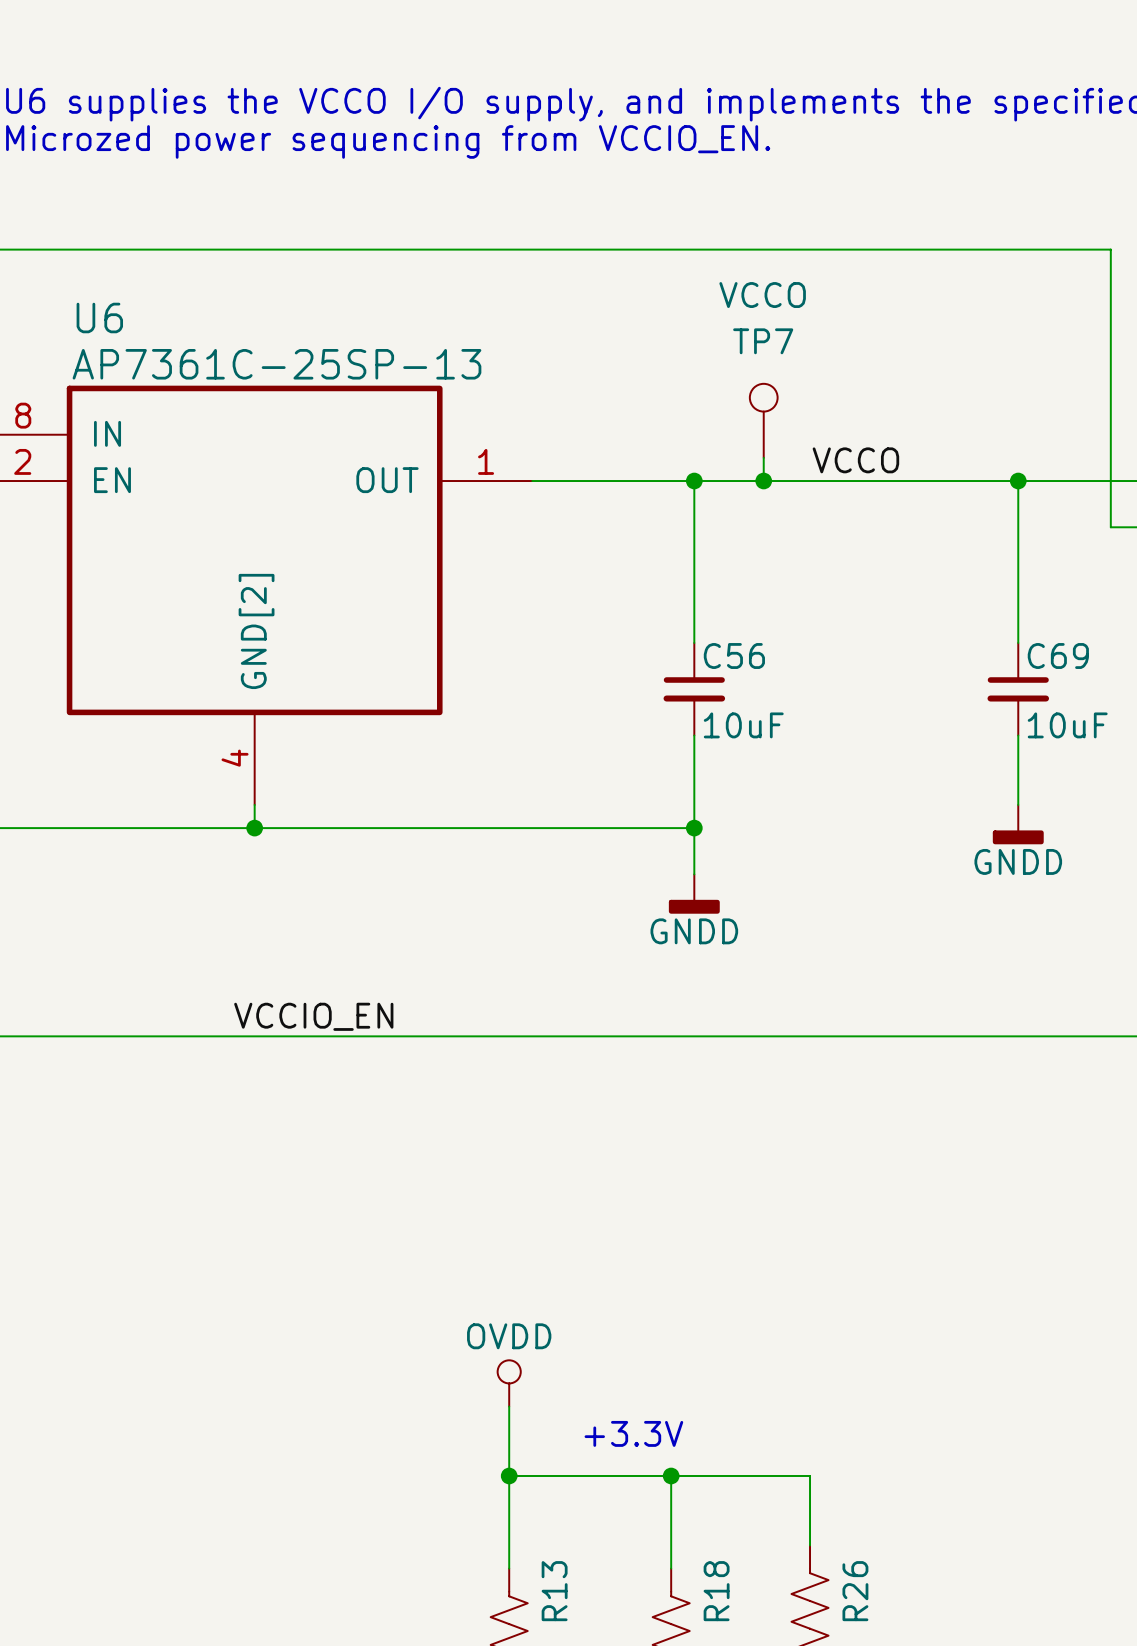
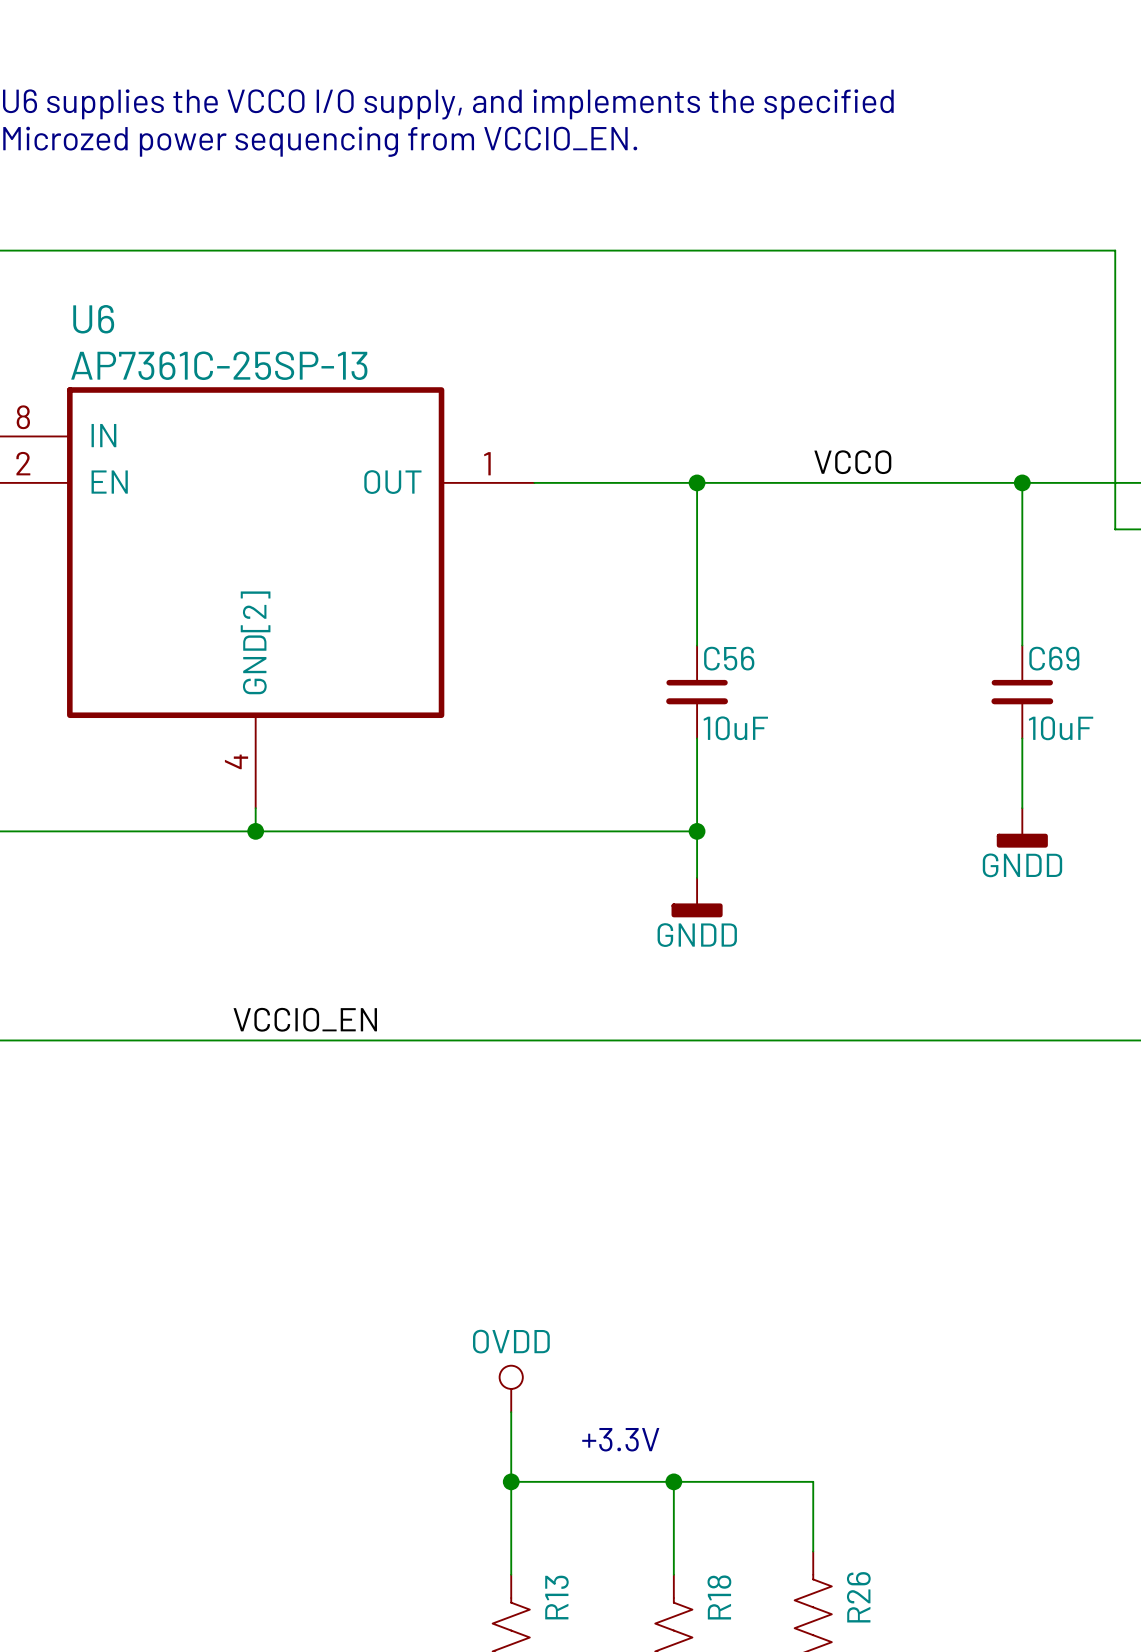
TP7: VCCO (763, 420) -> none
wire: (763, 457) (763, 481) -> none
junction: (763, 481) -> none

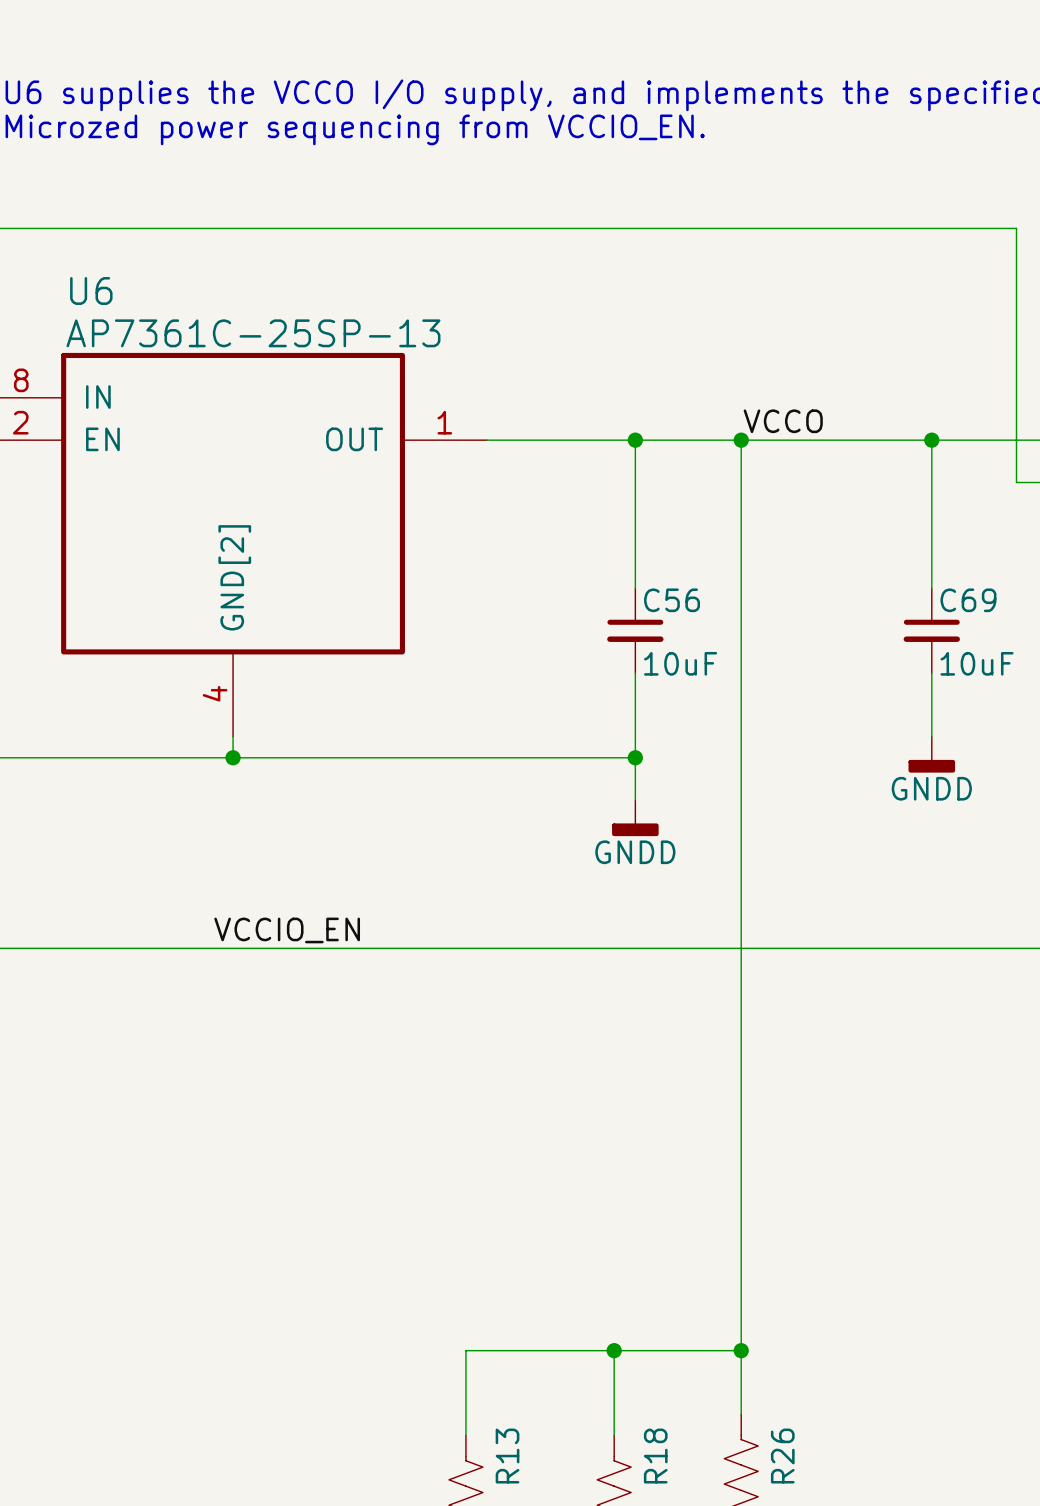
wire: none -> (741, 440) (741, 1350)
junction: none -> (741, 440)
power symbol: OVDD (511, 1388) -> none
wire: (511, 1412) (511, 1481) -> none
text: +3.3V (620, 1439) -> none
junction: (511, 1481) -> none
junction: none -> (741, 1350)

